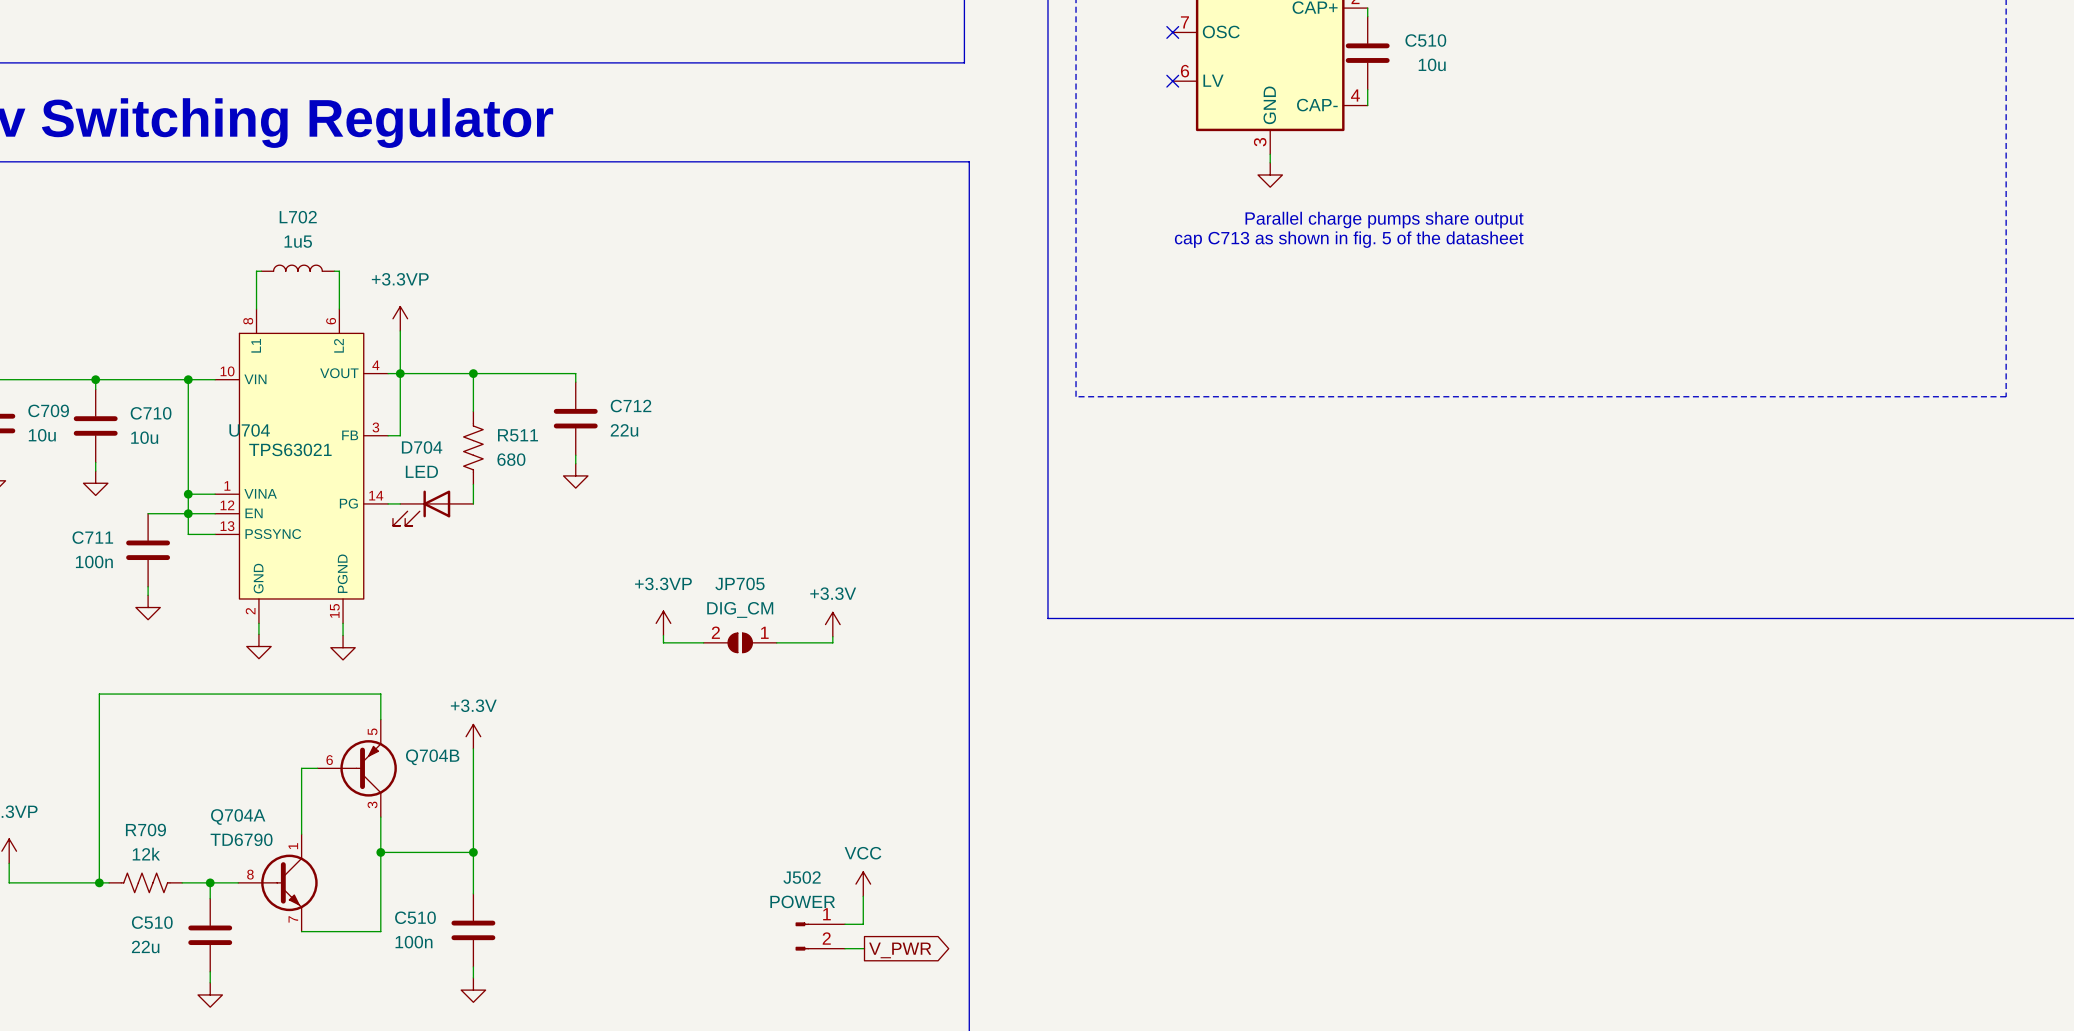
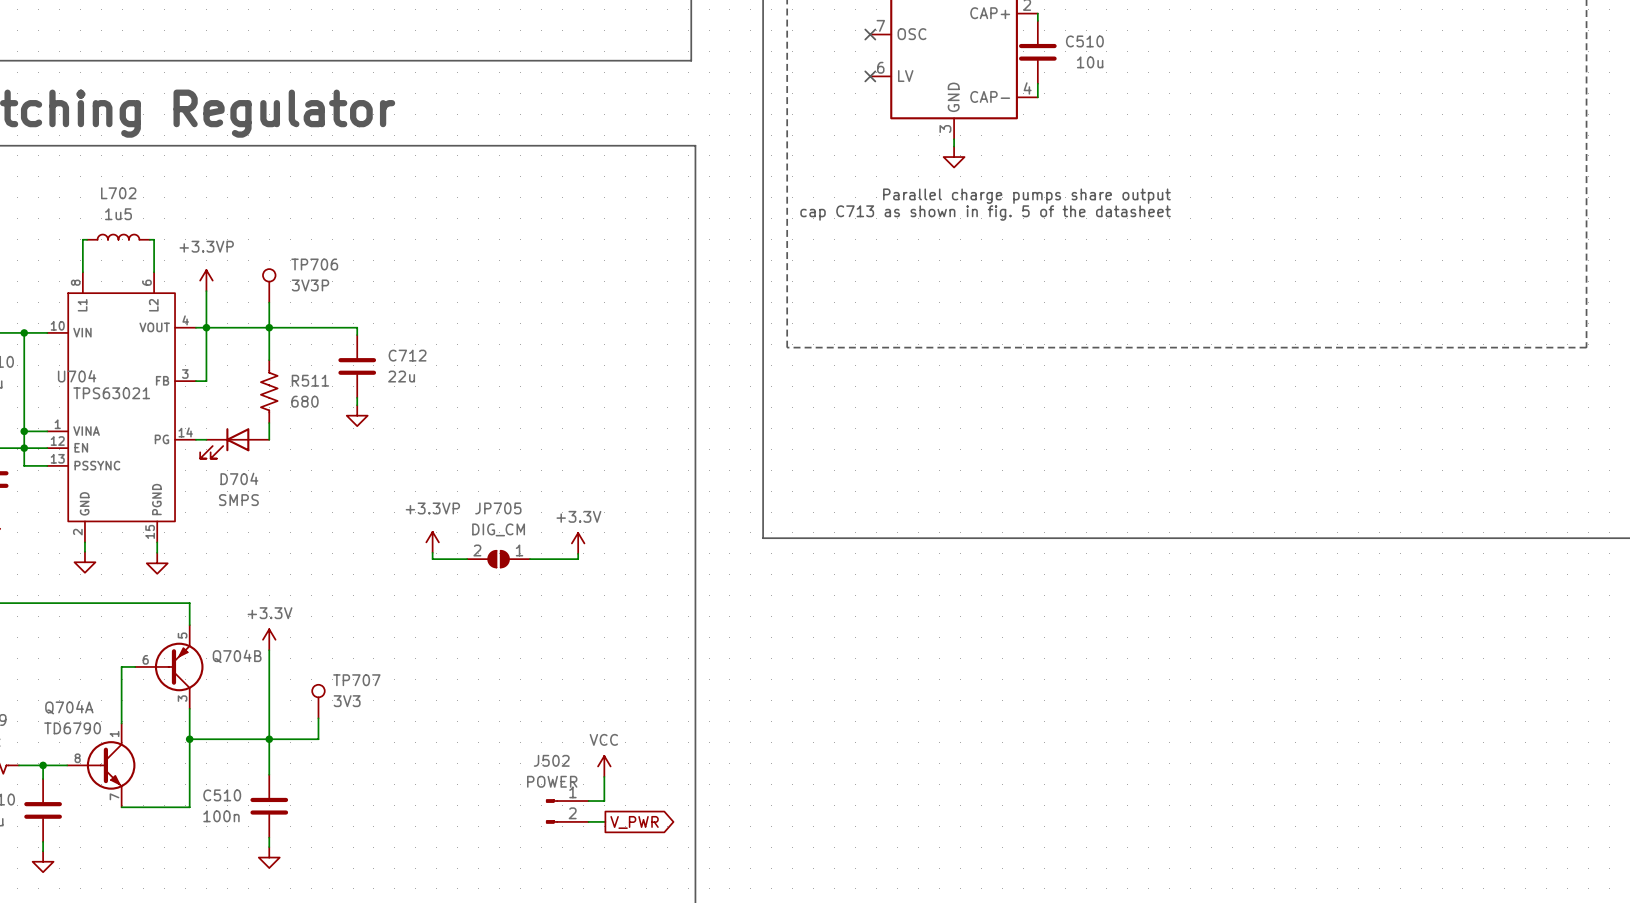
TP706: none -> 3V3P (269, 285)
wire: none -> (269, 302) (269, 327)
D704 name position: D704 (422, 447) -> D704 (239, 478)
D704 value: LED (421, 471) -> SMPS (238, 500)
TP707: none -> 3V3 (318, 701)
wire: none -> (318, 718) (318, 739) (269, 739)

